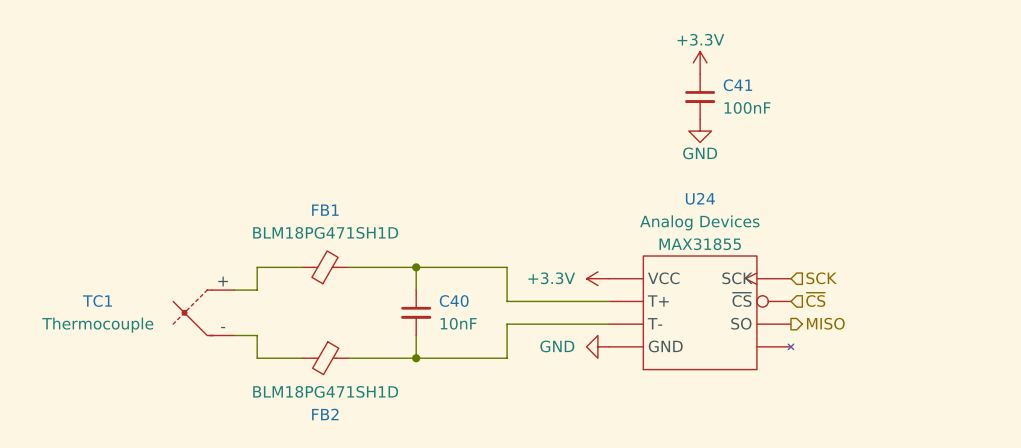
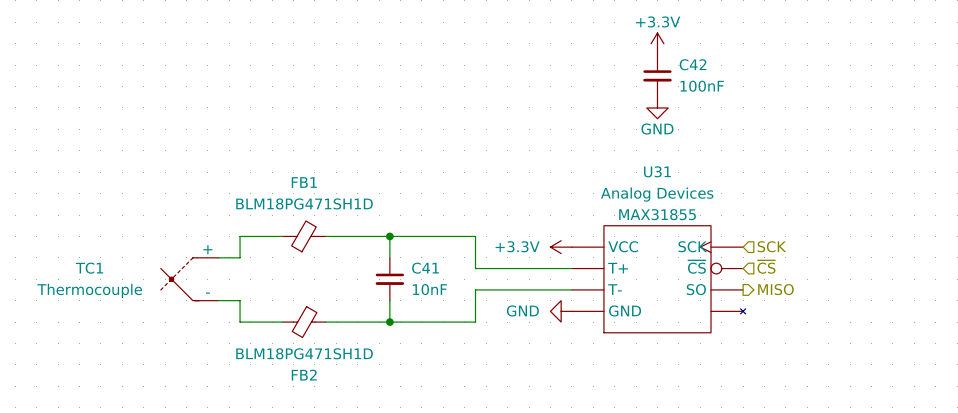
C41 name: C41 (737, 85) -> C42 (693, 64)
U24 name: U24 (700, 198) -> U31 (657, 171)
C40 name: C40 (454, 301) -> C41 (425, 268)

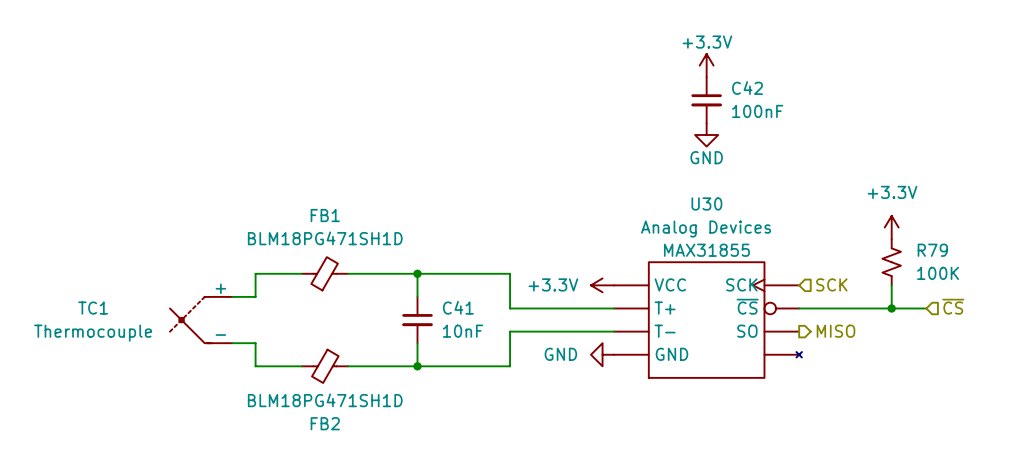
U31 name: U31 (657, 171) -> U30 (706, 203)
power symbol: none -> +3.3V (891, 227)
R79: none -> 100K (891, 262)
wire: none -> (891, 285) (891, 308)
hierarchical label position: ~{CS} (766, 267) -> ~{CS} (953, 306)
wire: none -> (799, 308) (926, 308)
junction: none -> (891, 308)

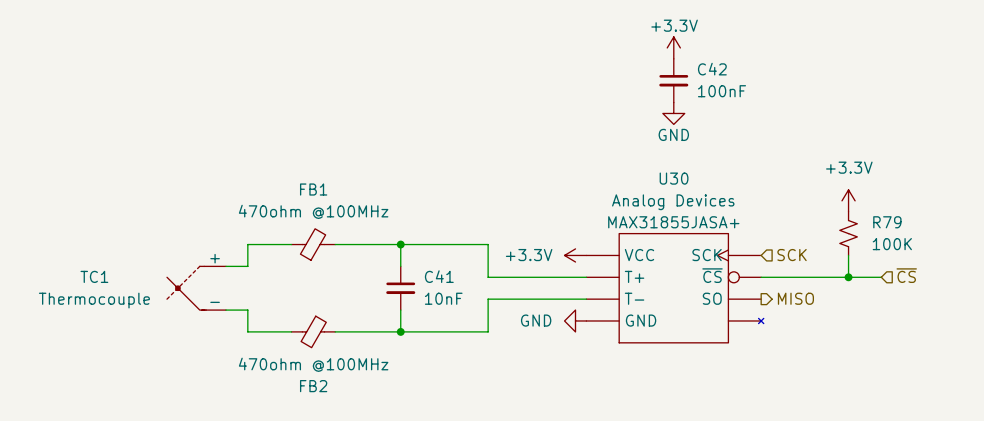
FB1 value: BLM18PG471SH1D (325, 238) -> 470ohm @100MHz (313, 211)
U30 text: MAX31855 (706, 250) -> MAX31855JASA+ (673, 222)
FB2 value: BLM18PG471SH1D (325, 400) -> 470ohm @100MHz (313, 364)

